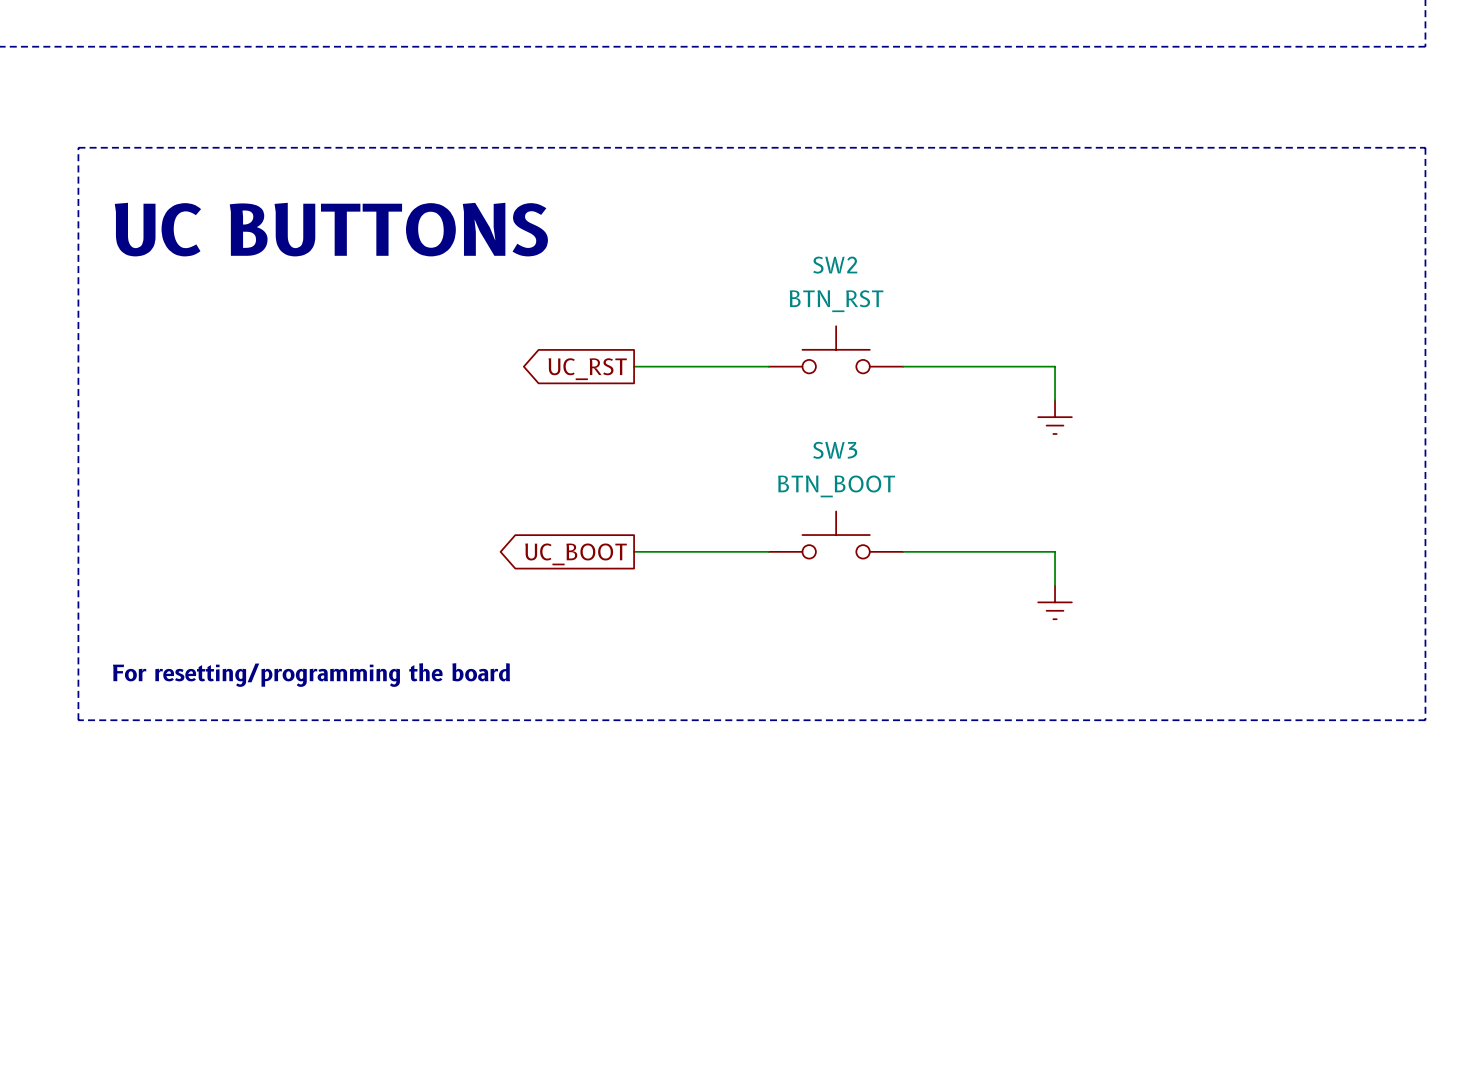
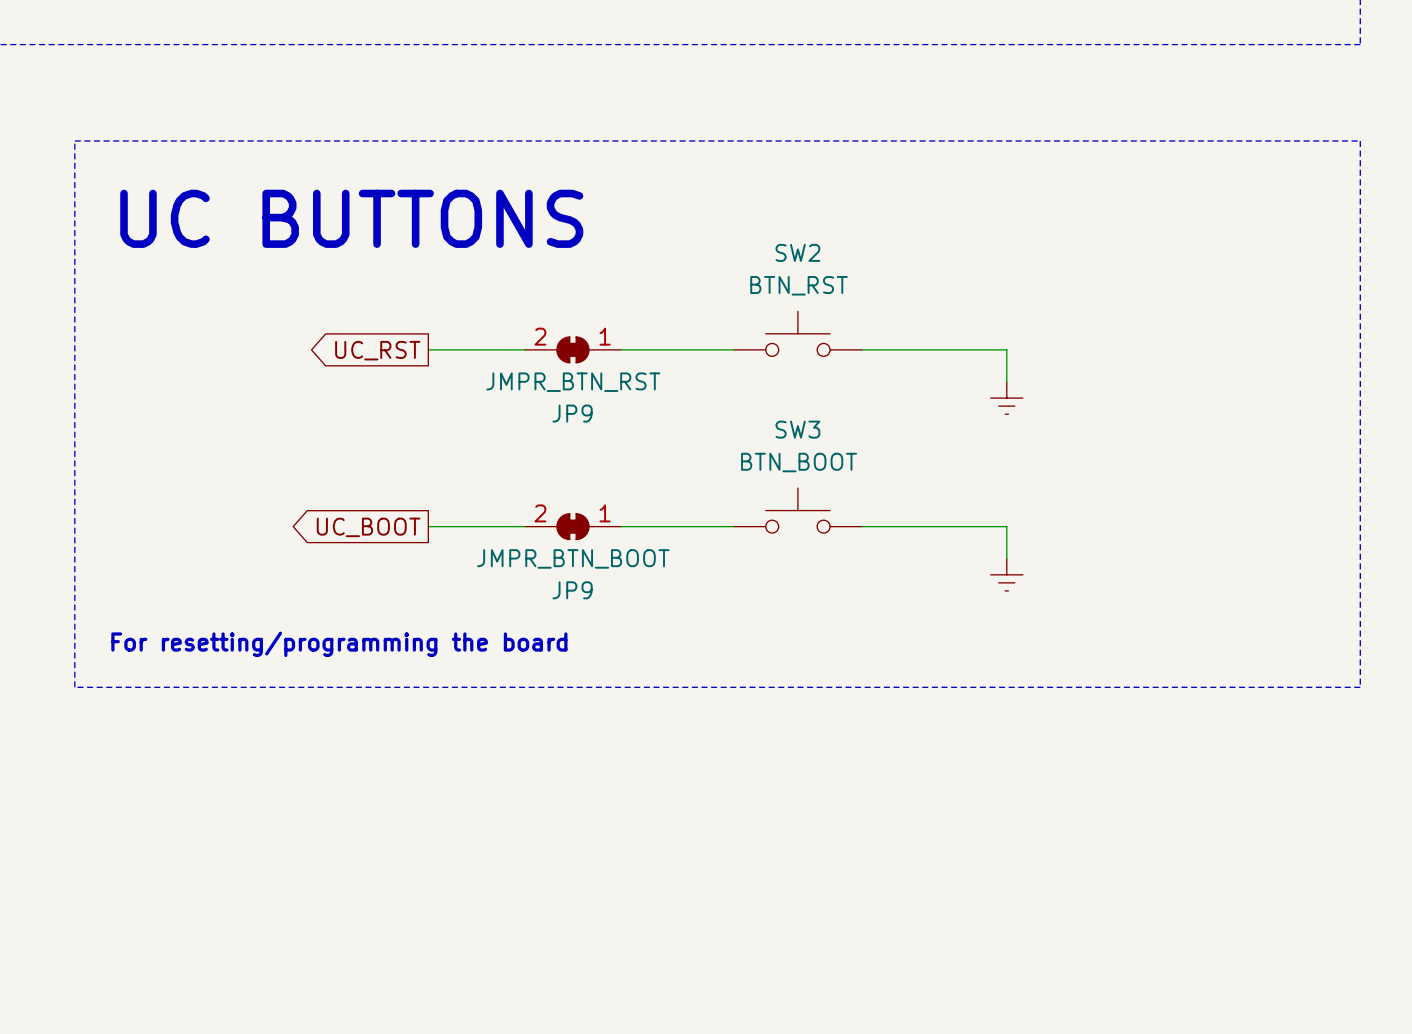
wire: none -> (428, 349) (524, 349)
JP9: none -> JMPR_BTN_RST (572, 349)
global label position: UC_RST (587, 369) -> UC_RST (377, 350)
wire: none -> (428, 526) (524, 526)
JP9: none -> JMPR_BTN_BOOT (572, 526)
global label position: UC_BOOT (576, 554) -> UC_BOOT (368, 527)

